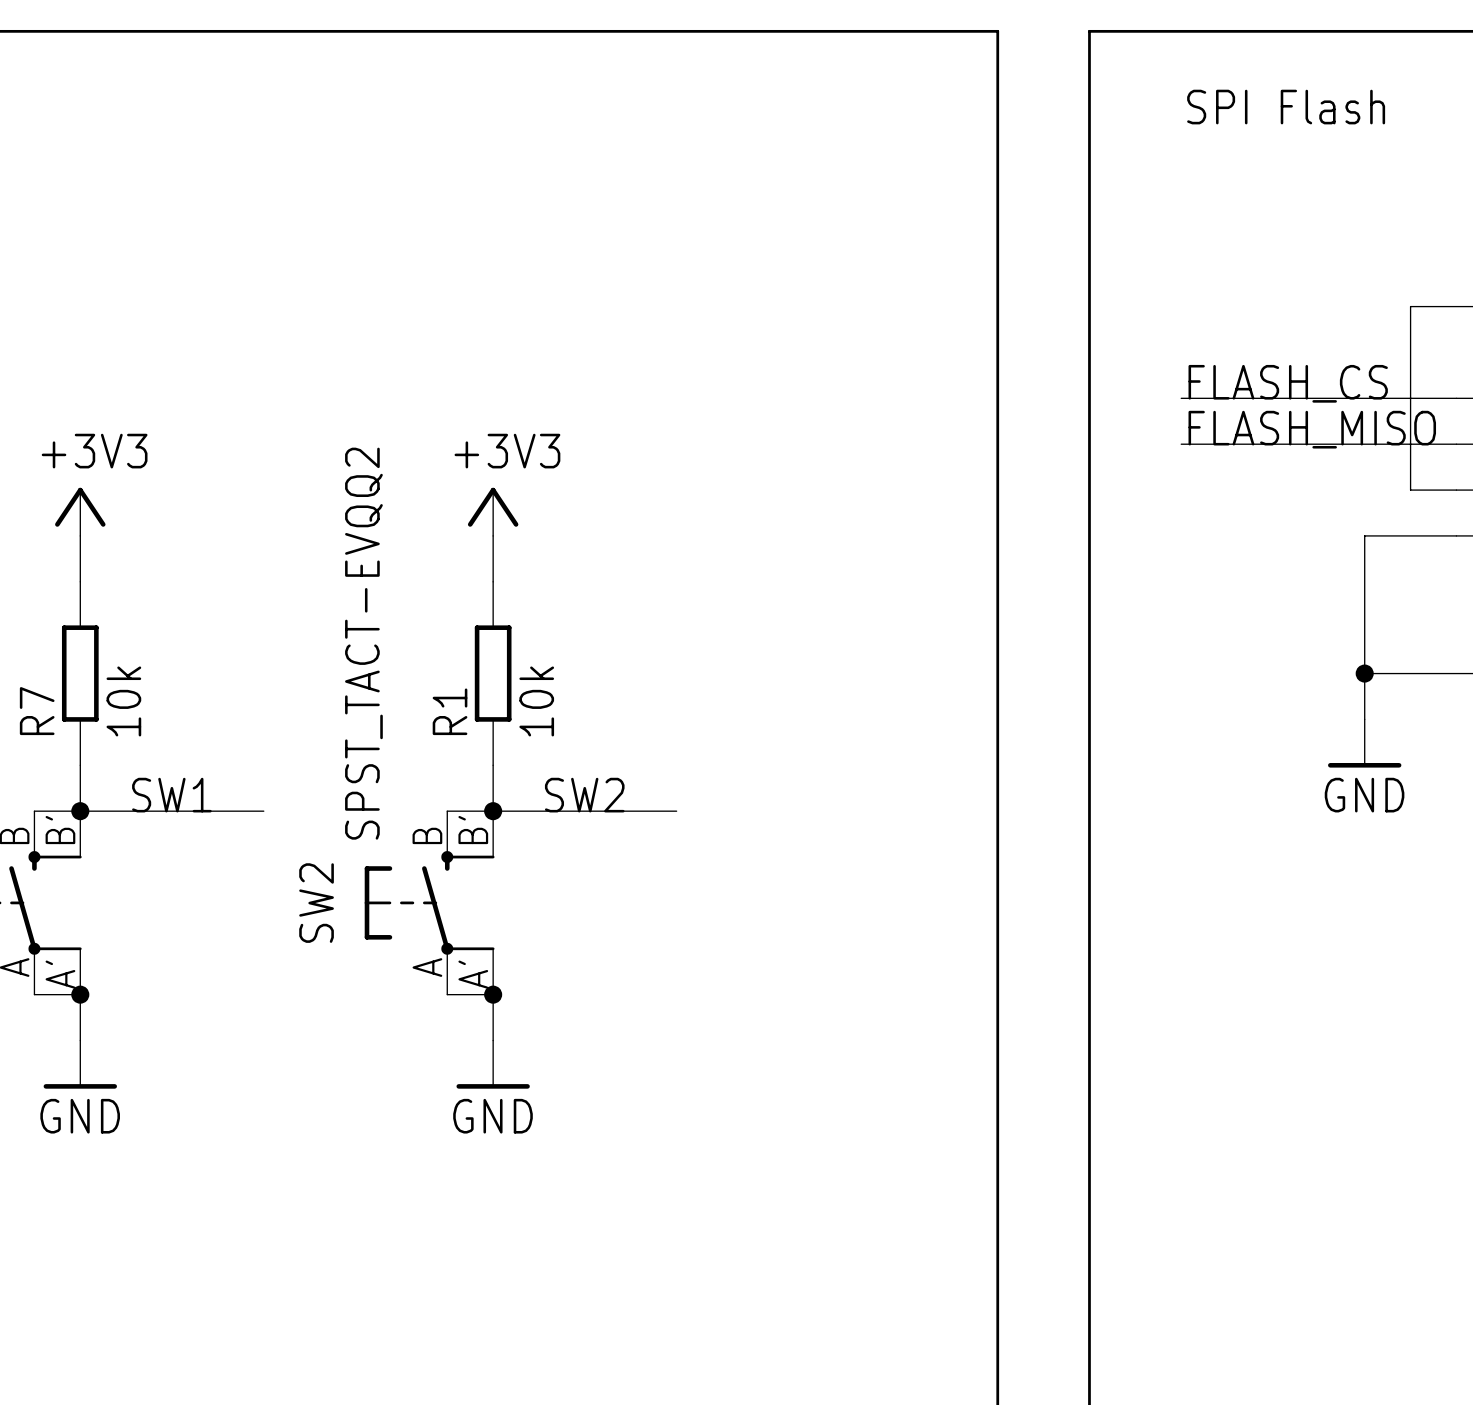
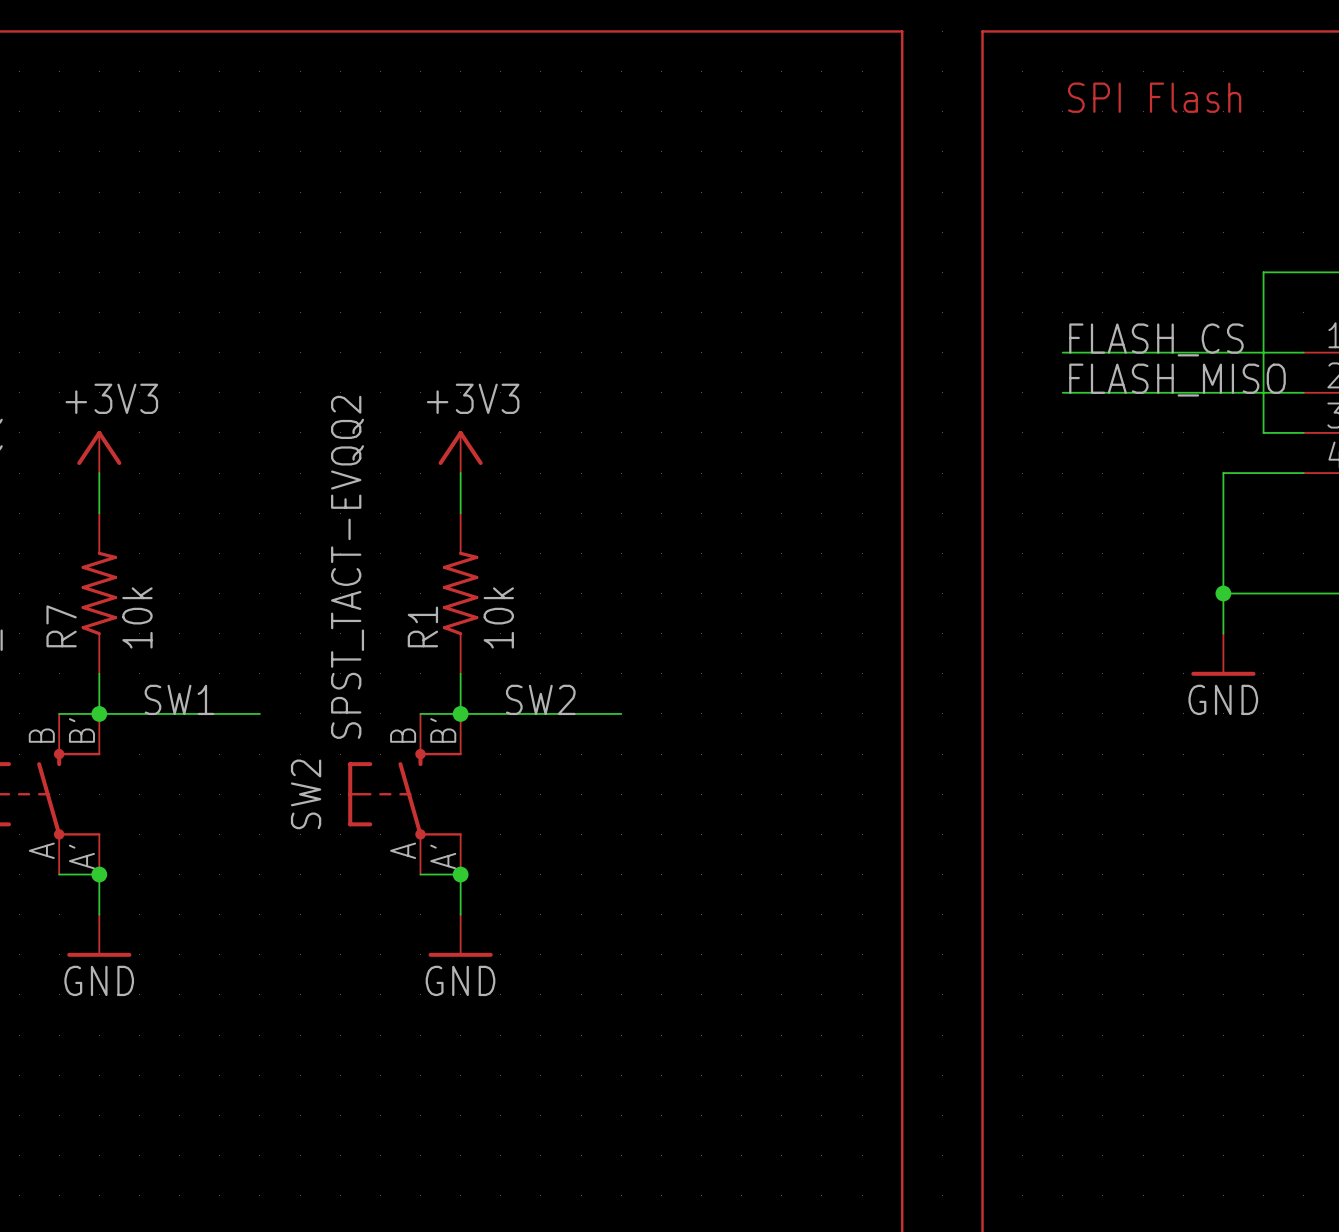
R7 symbol: [61, 581, 99, 766] -> [81, 513, 117, 674]
R1 symbol: [474, 581, 512, 766] -> [442, 513, 479, 674]

